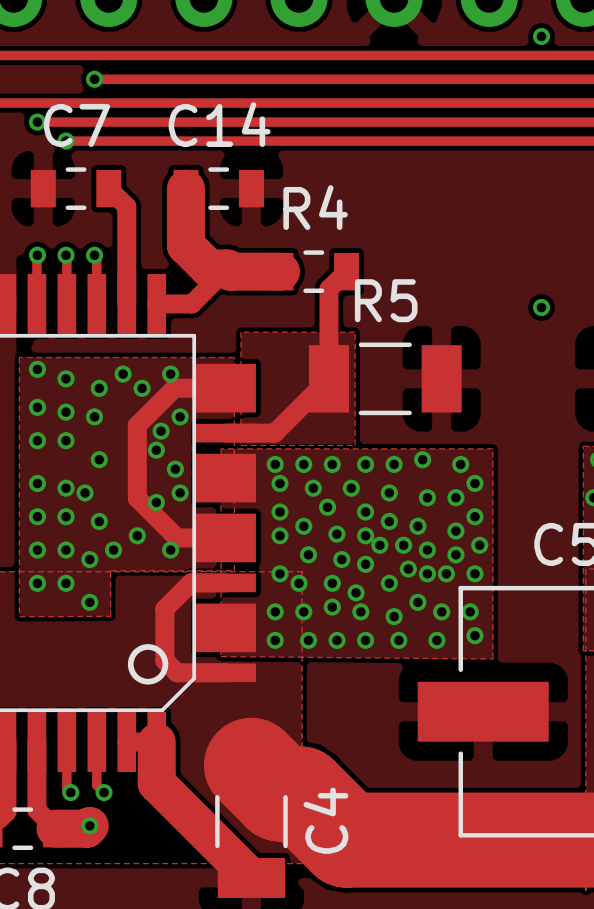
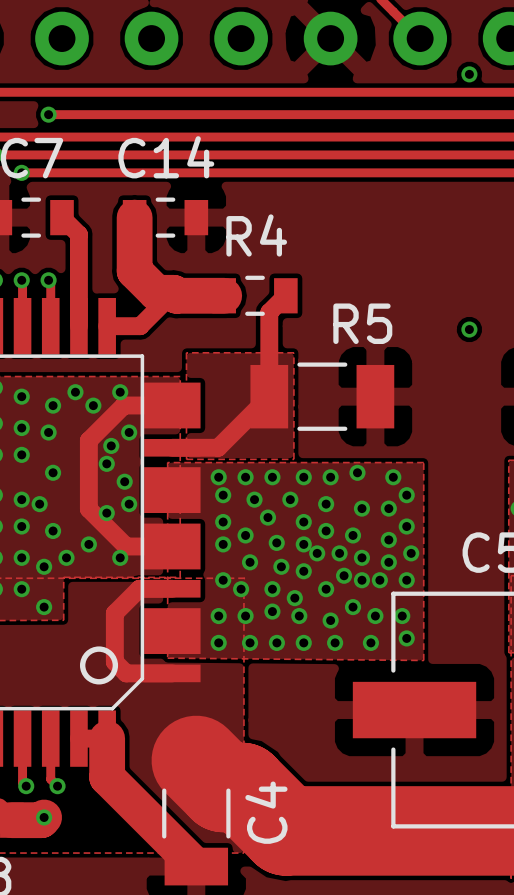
R5 name position: R5 (386, 300) -> R5 (362, 323)

